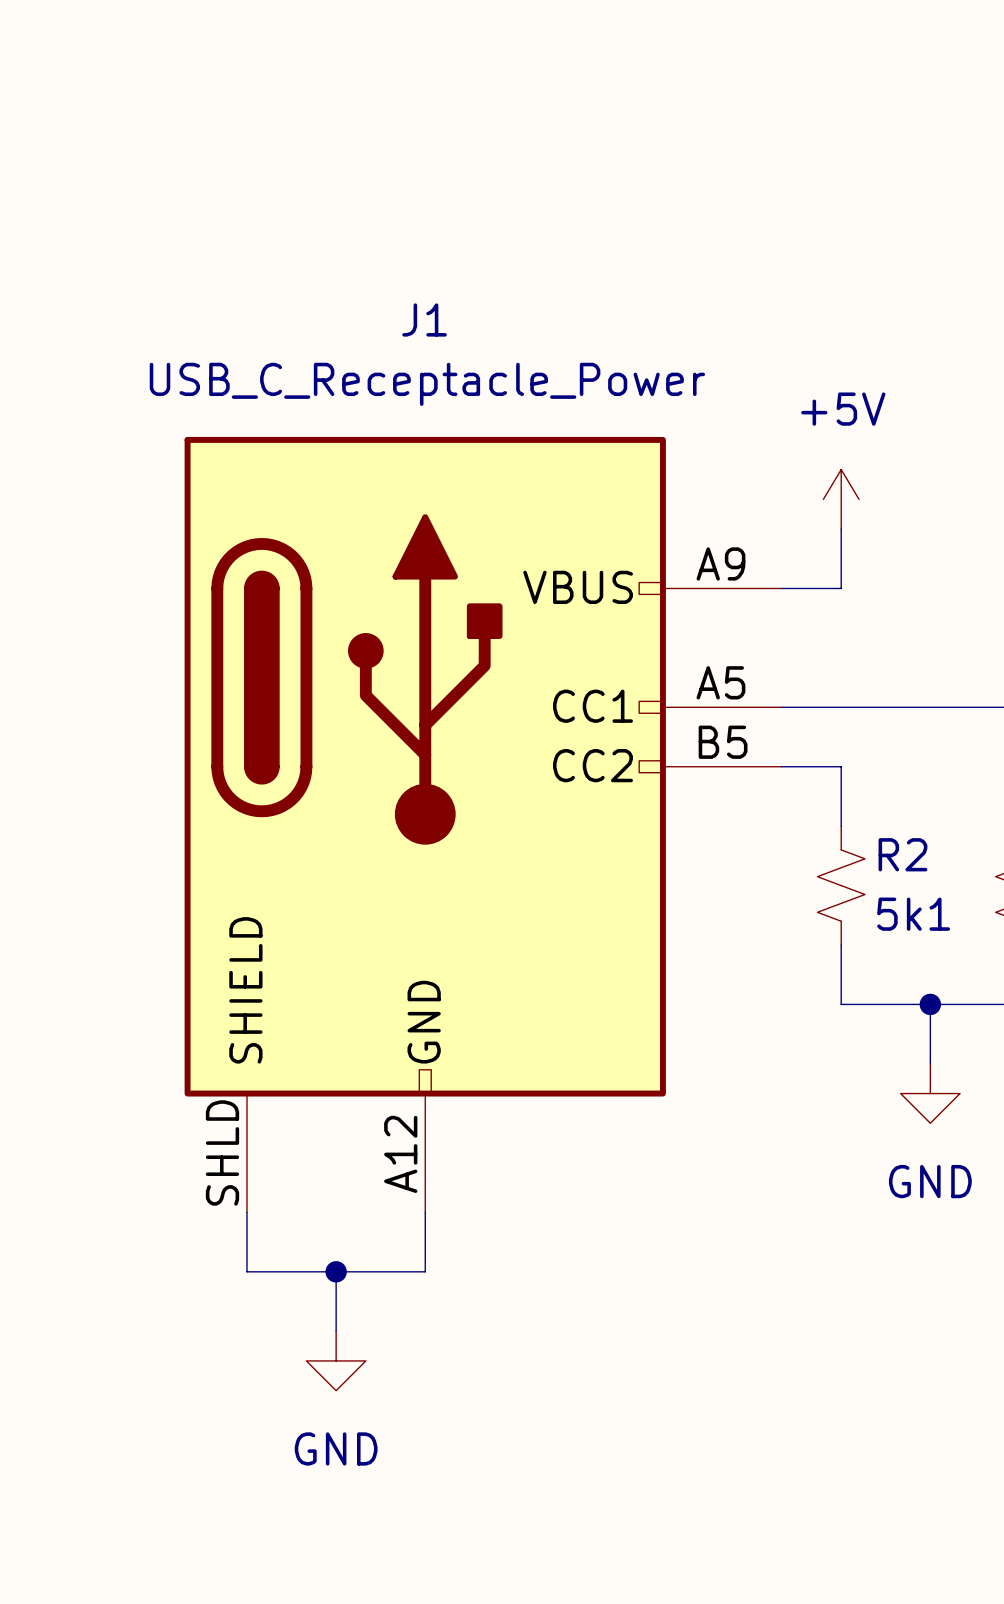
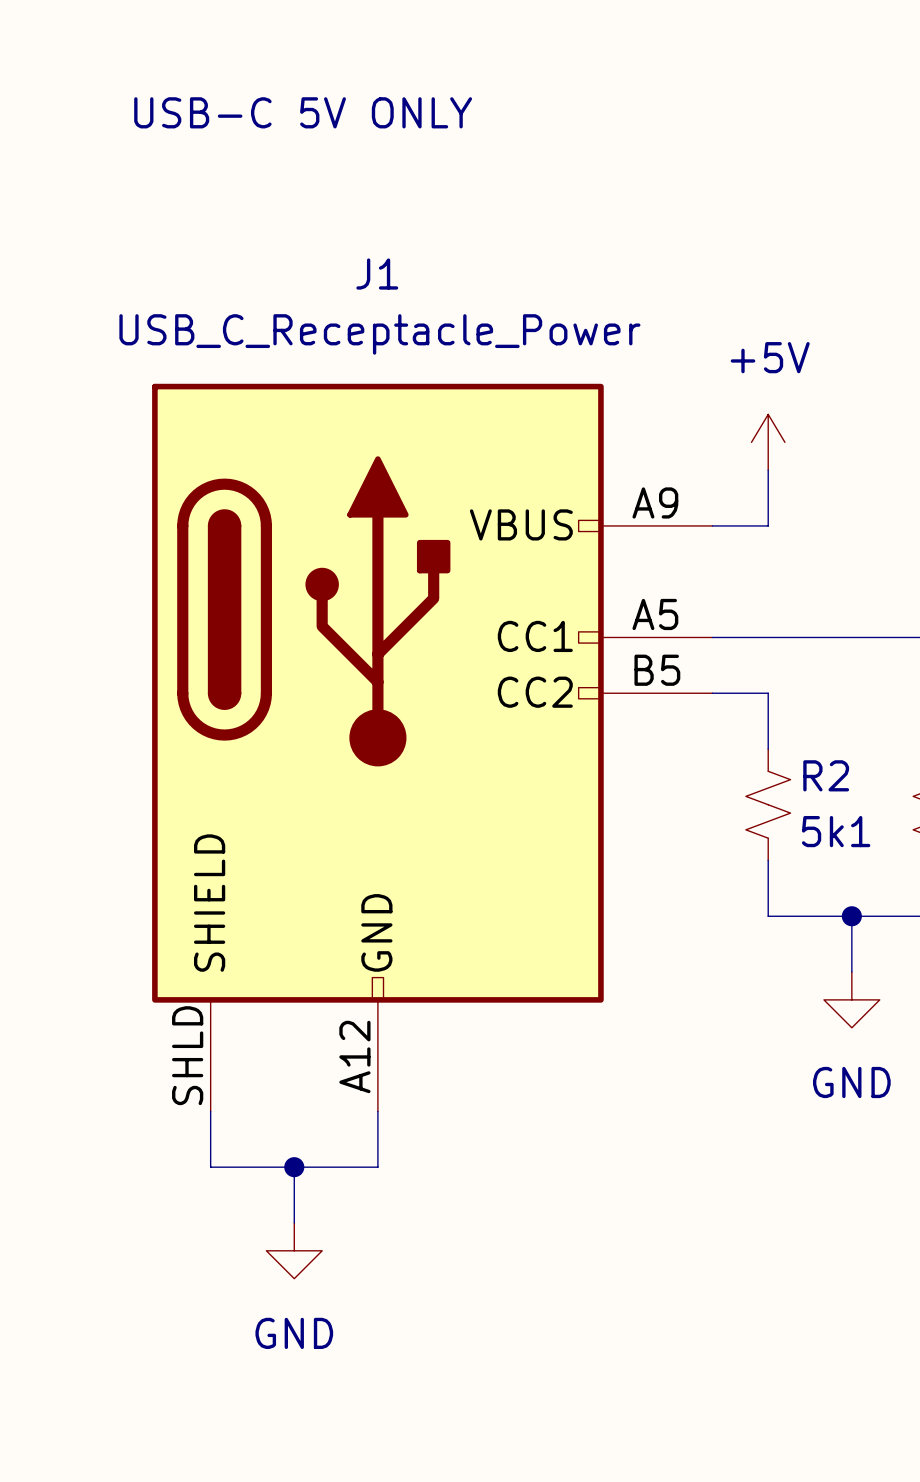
text: none -> USB-C 5V ONLY (303, 112)

